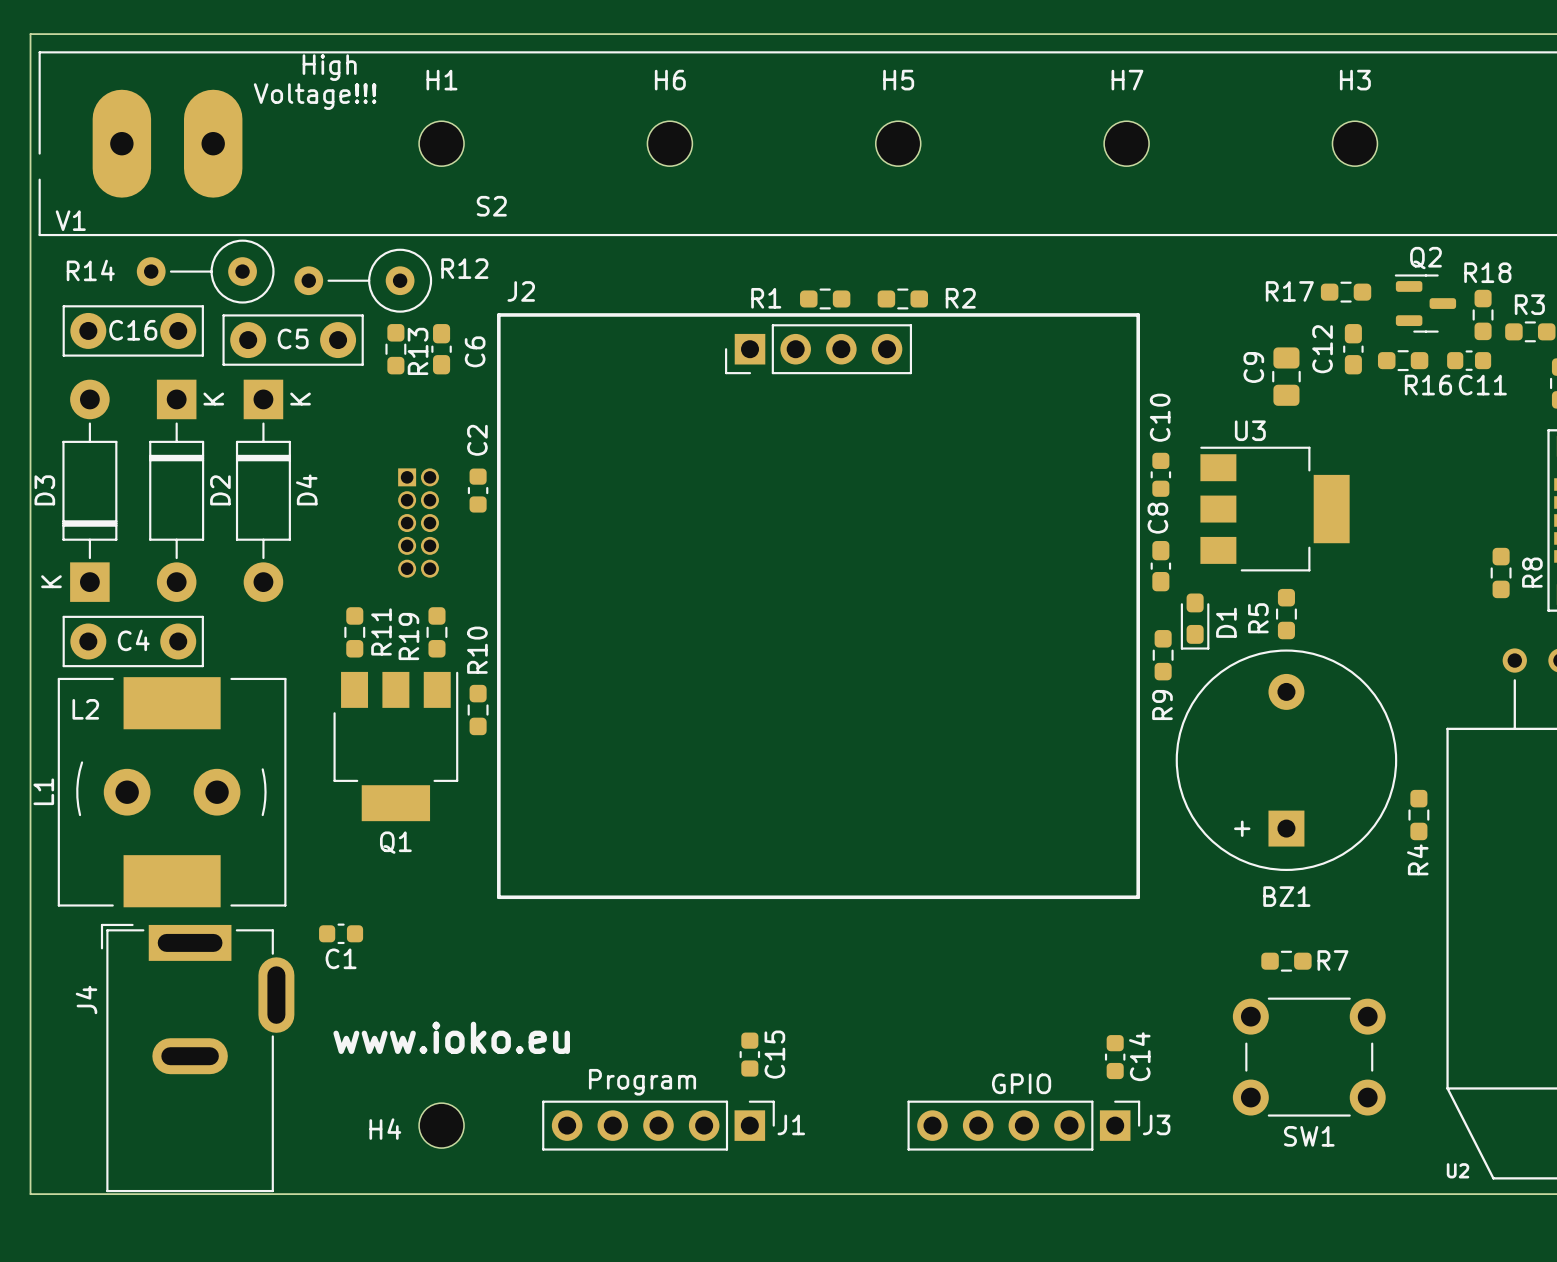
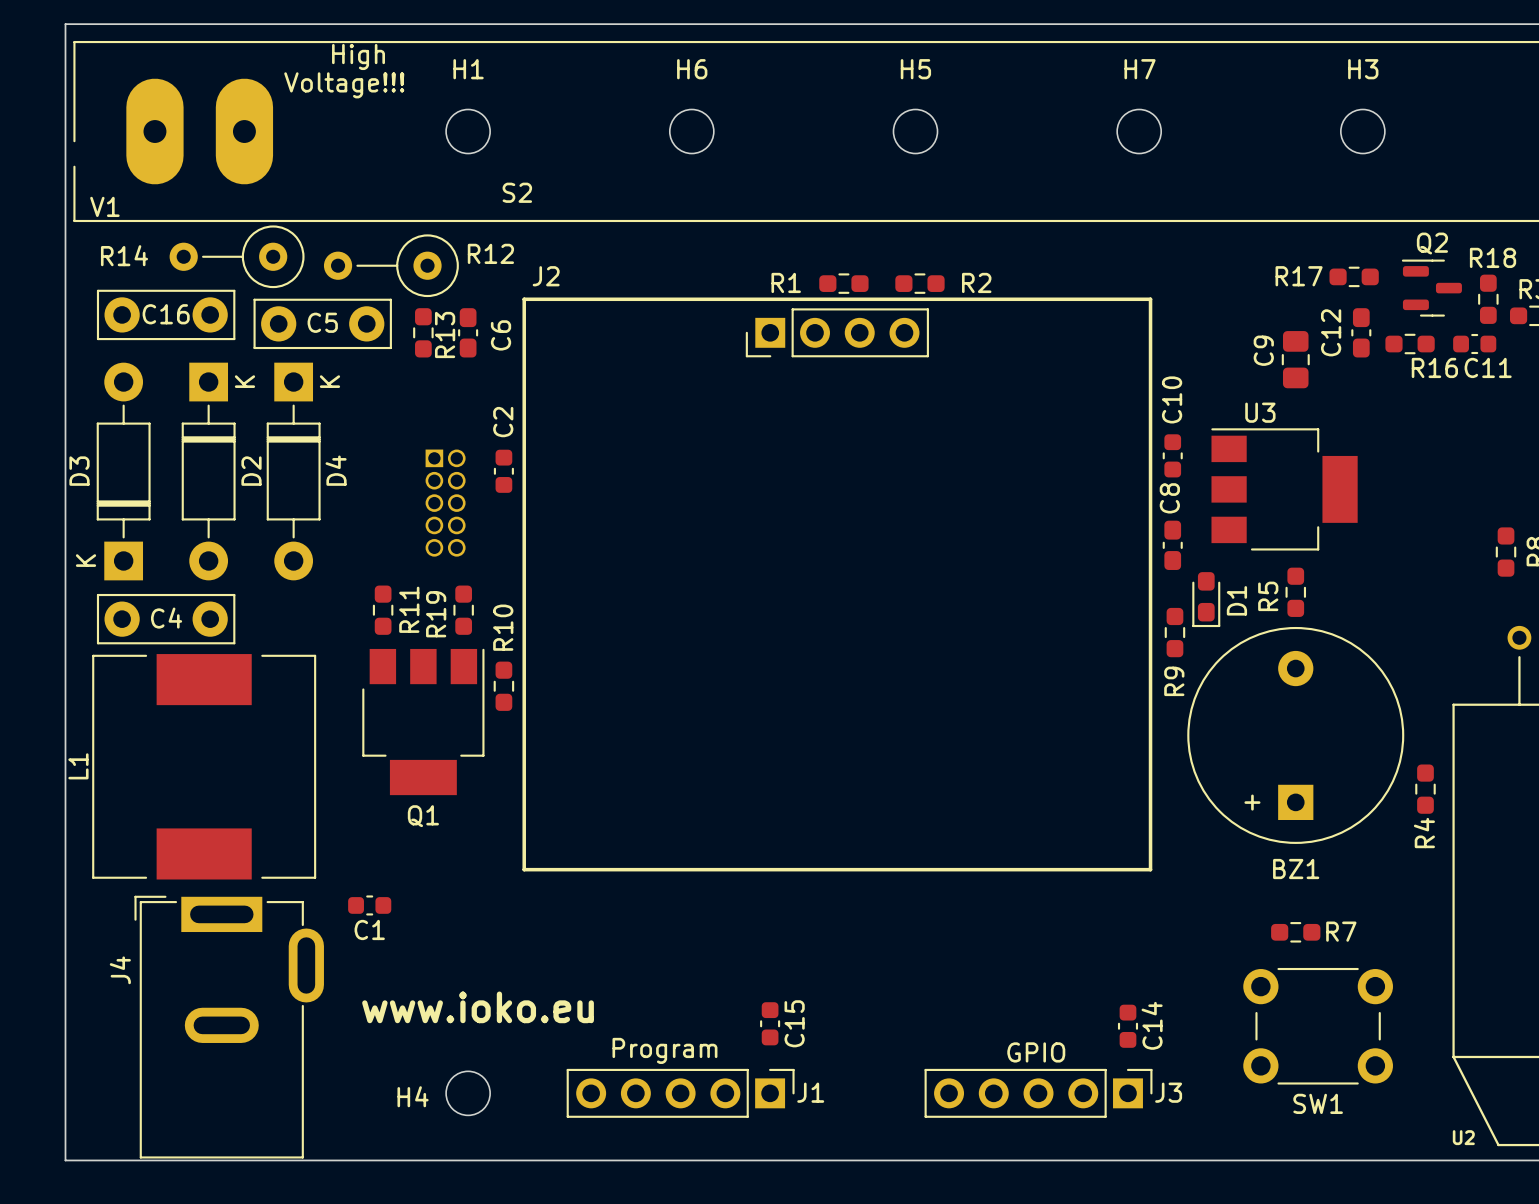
L2: (171, 788) -> none

